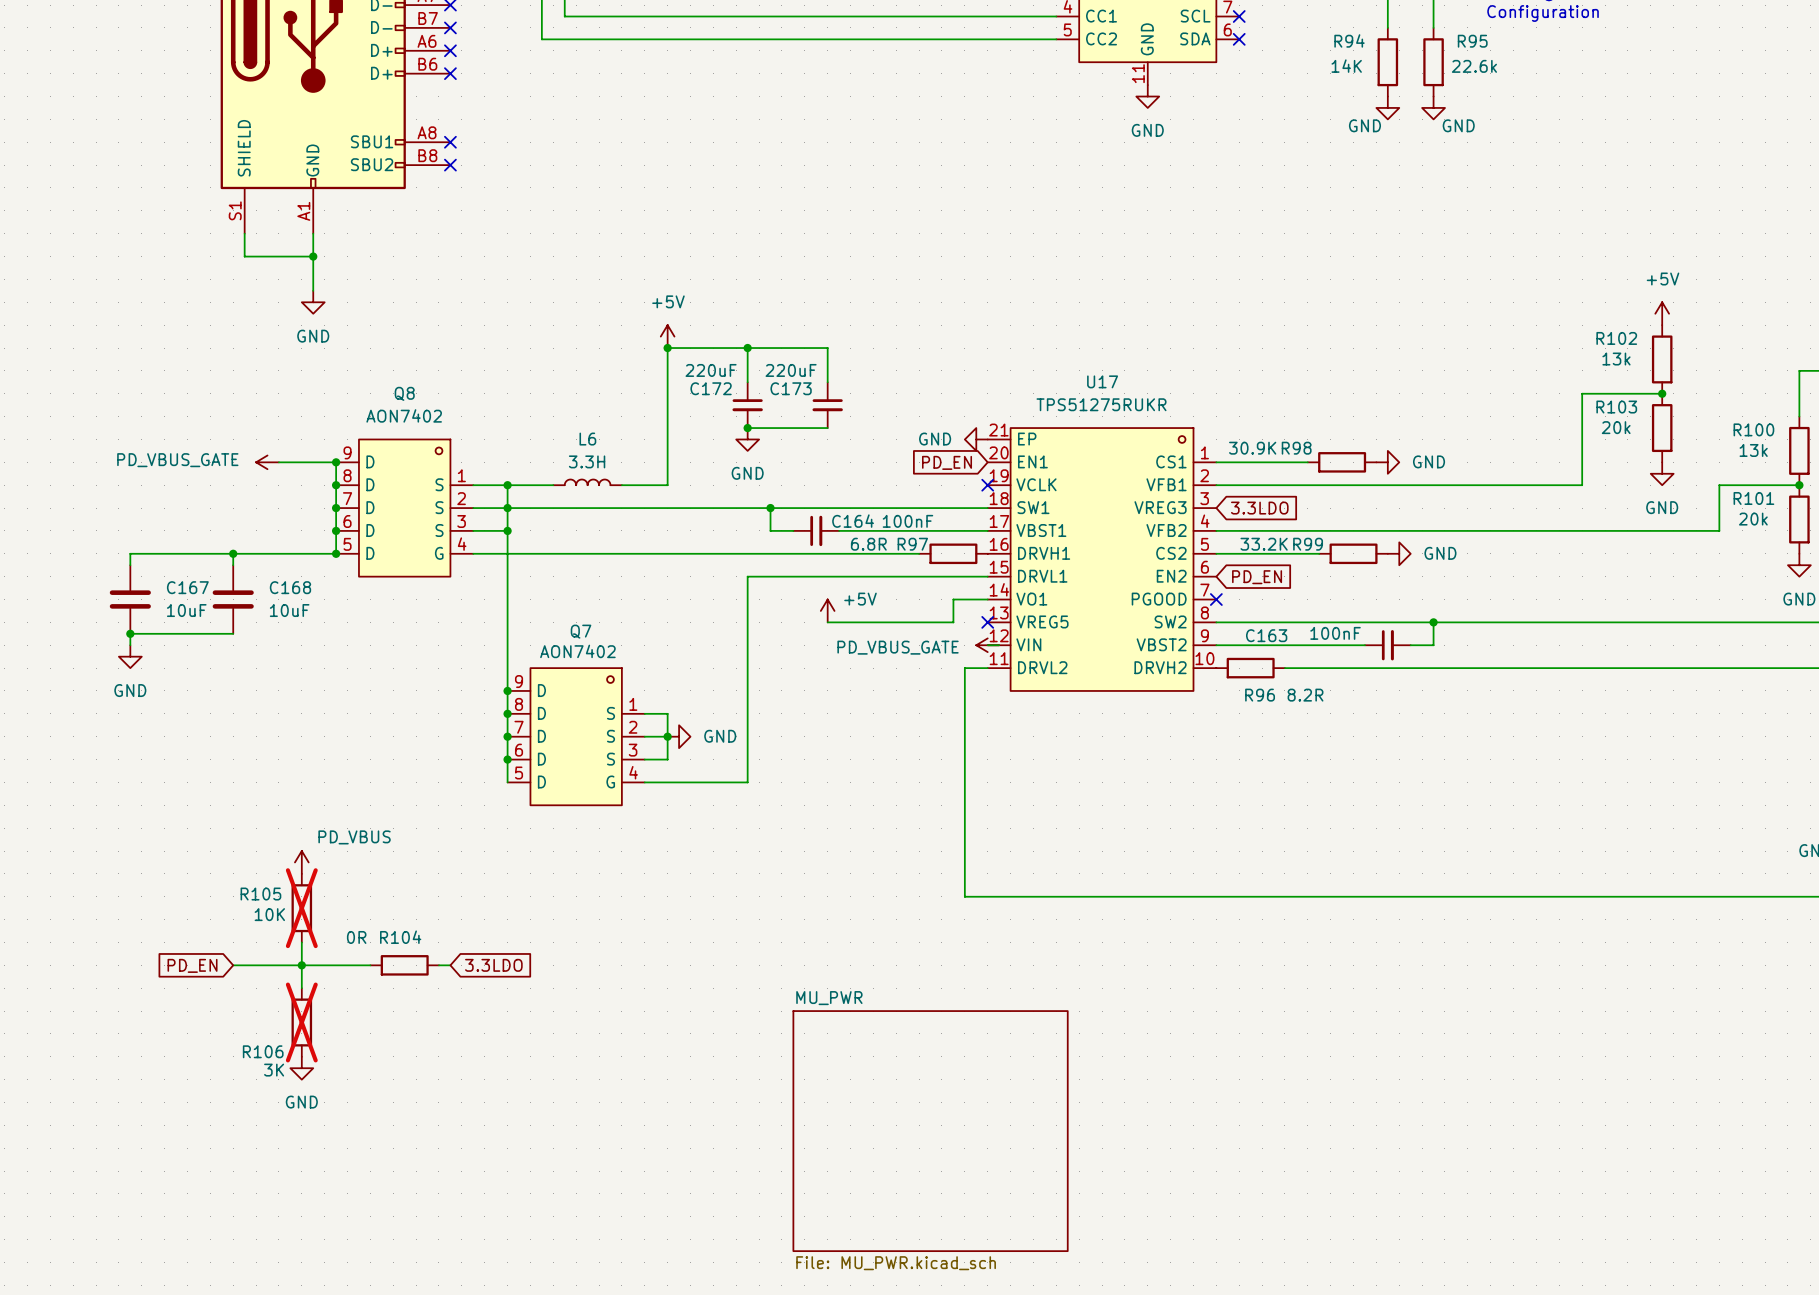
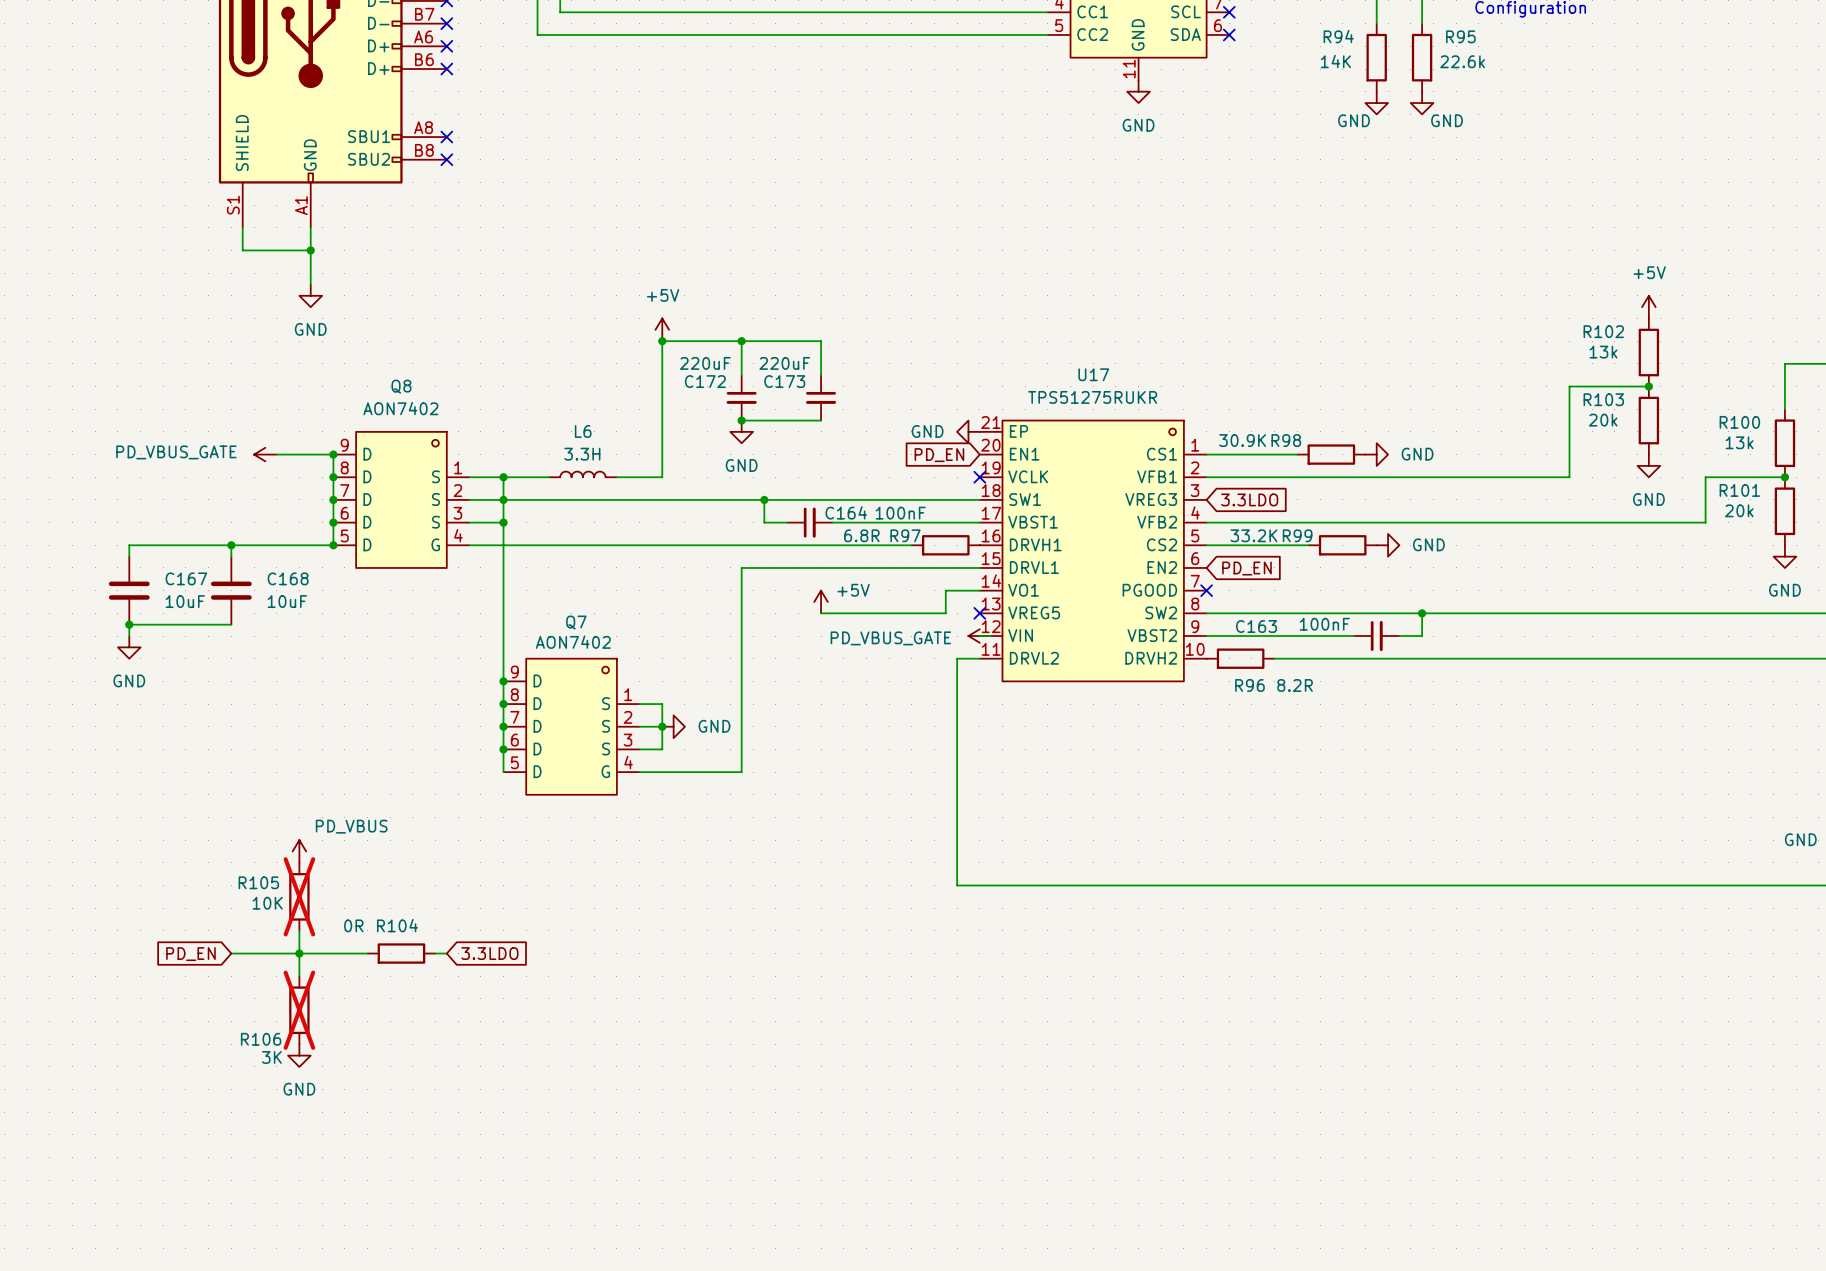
sheet MU_PWR: File: MU_PWR.kicad_sch (930, 1131) -> none

